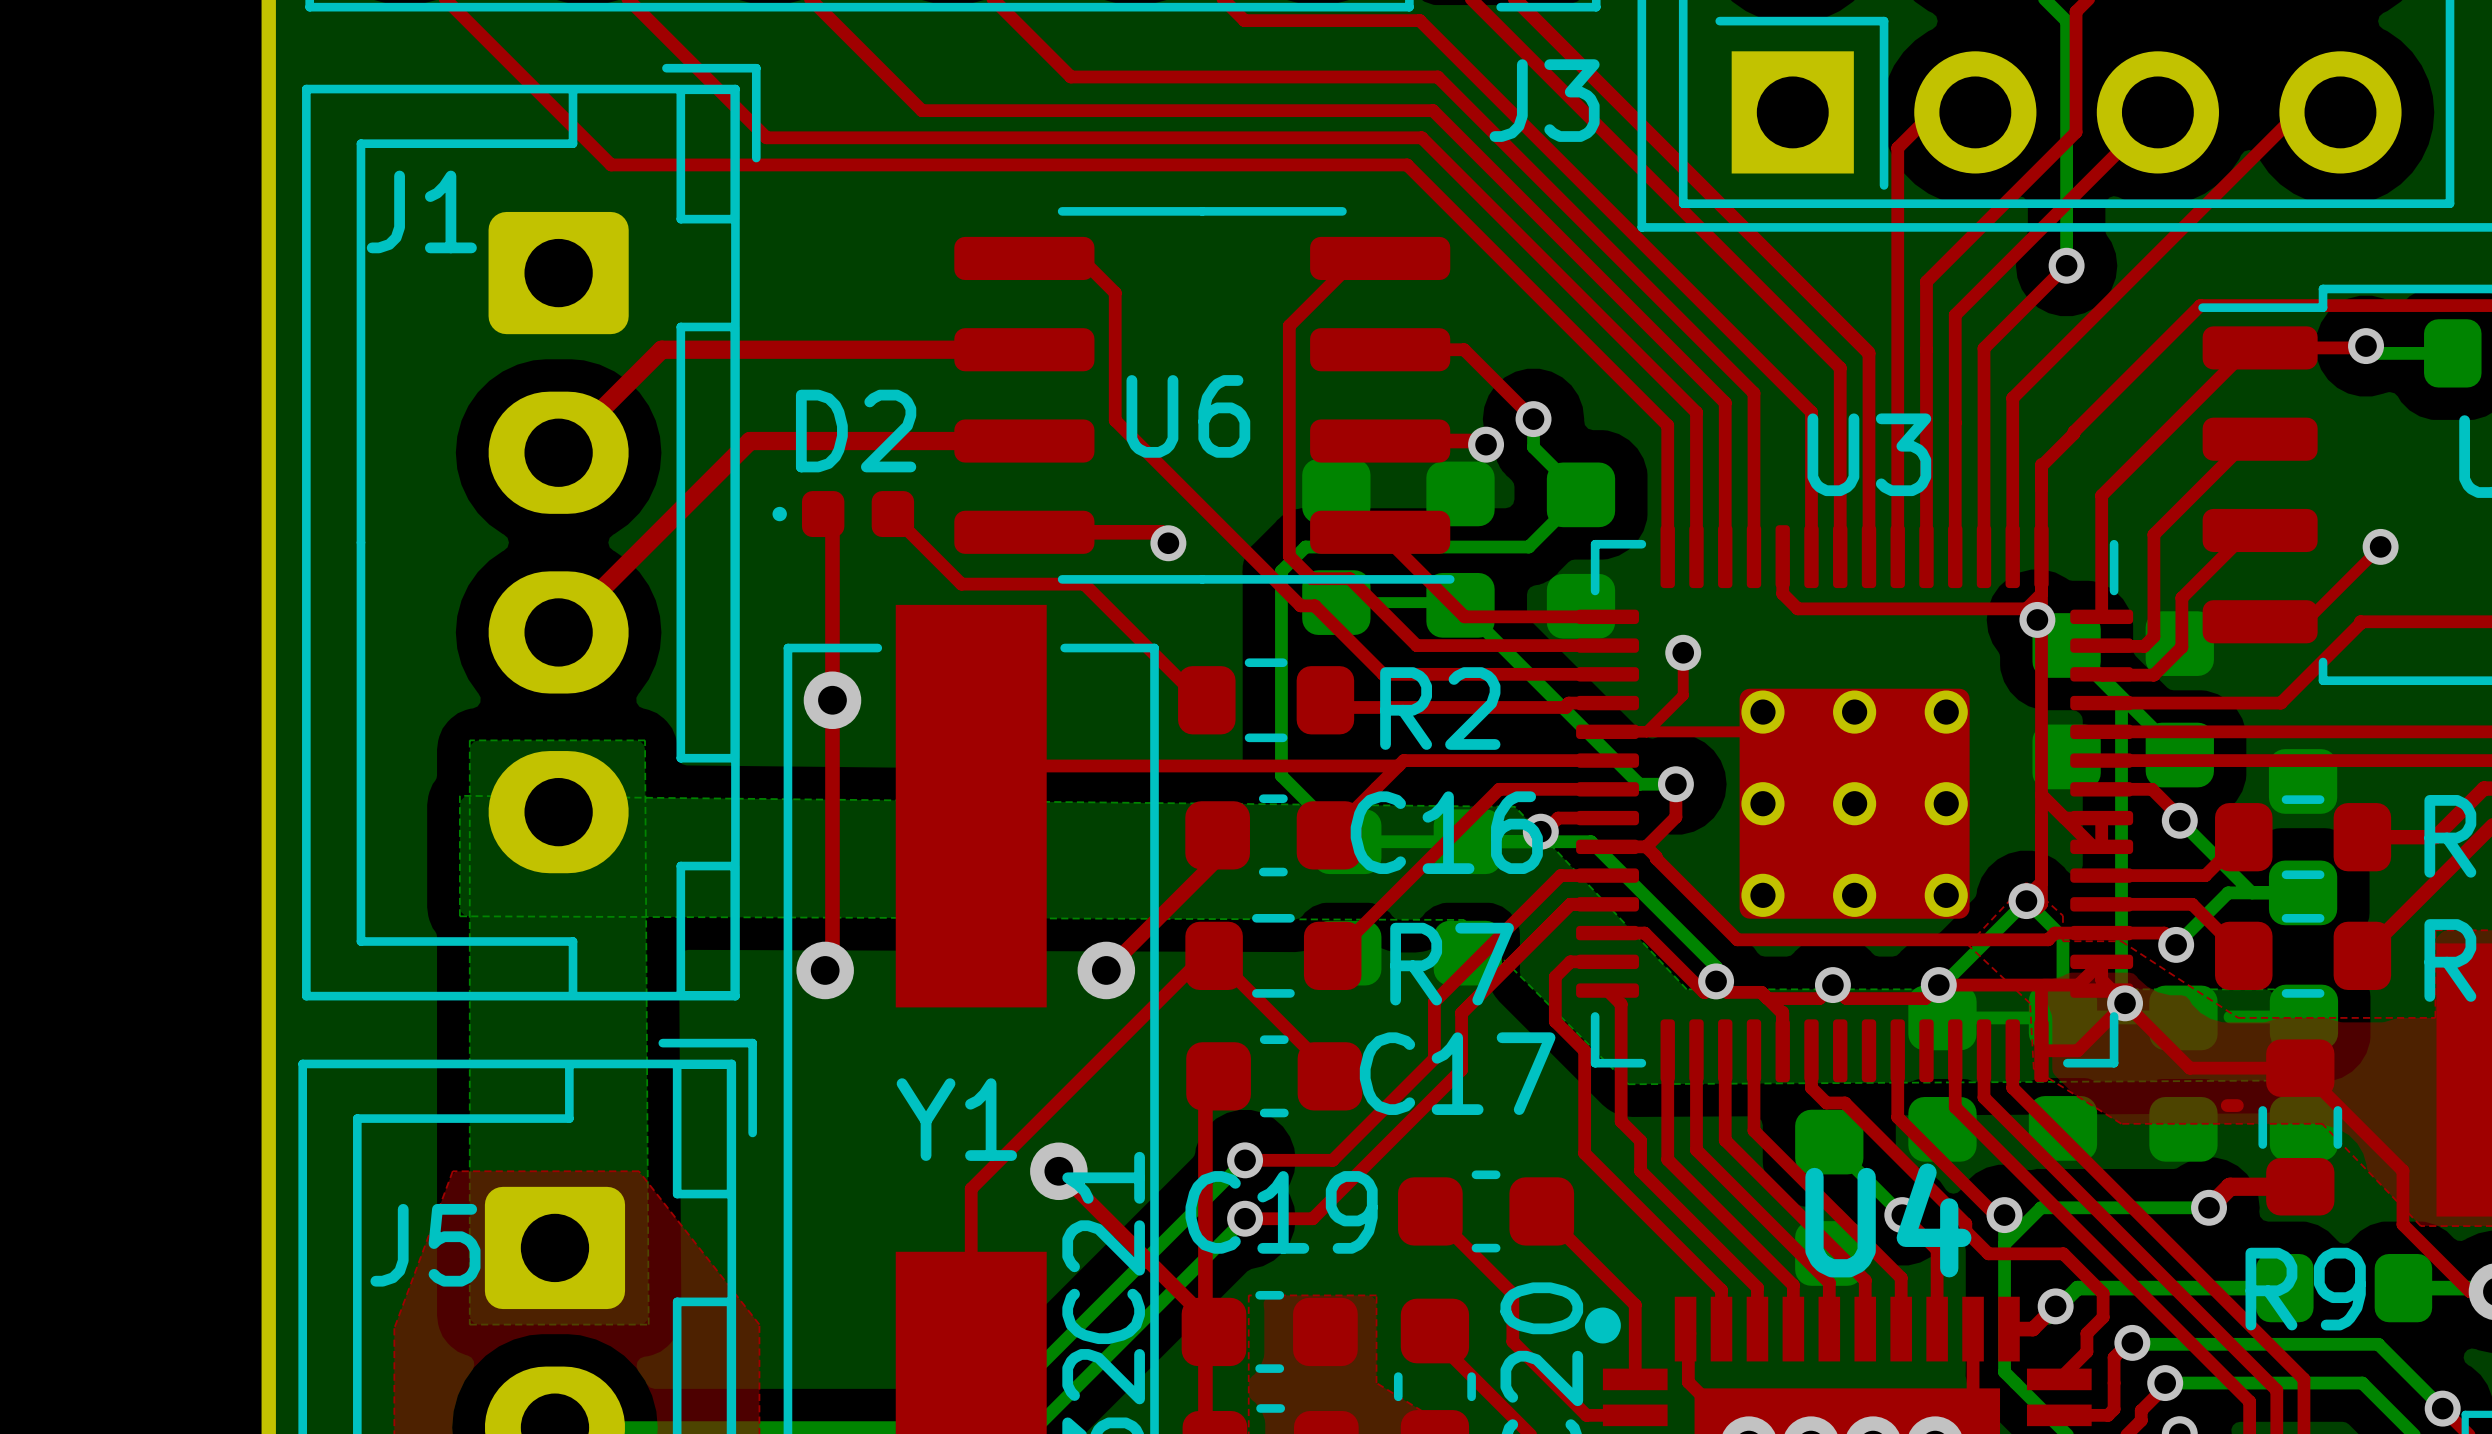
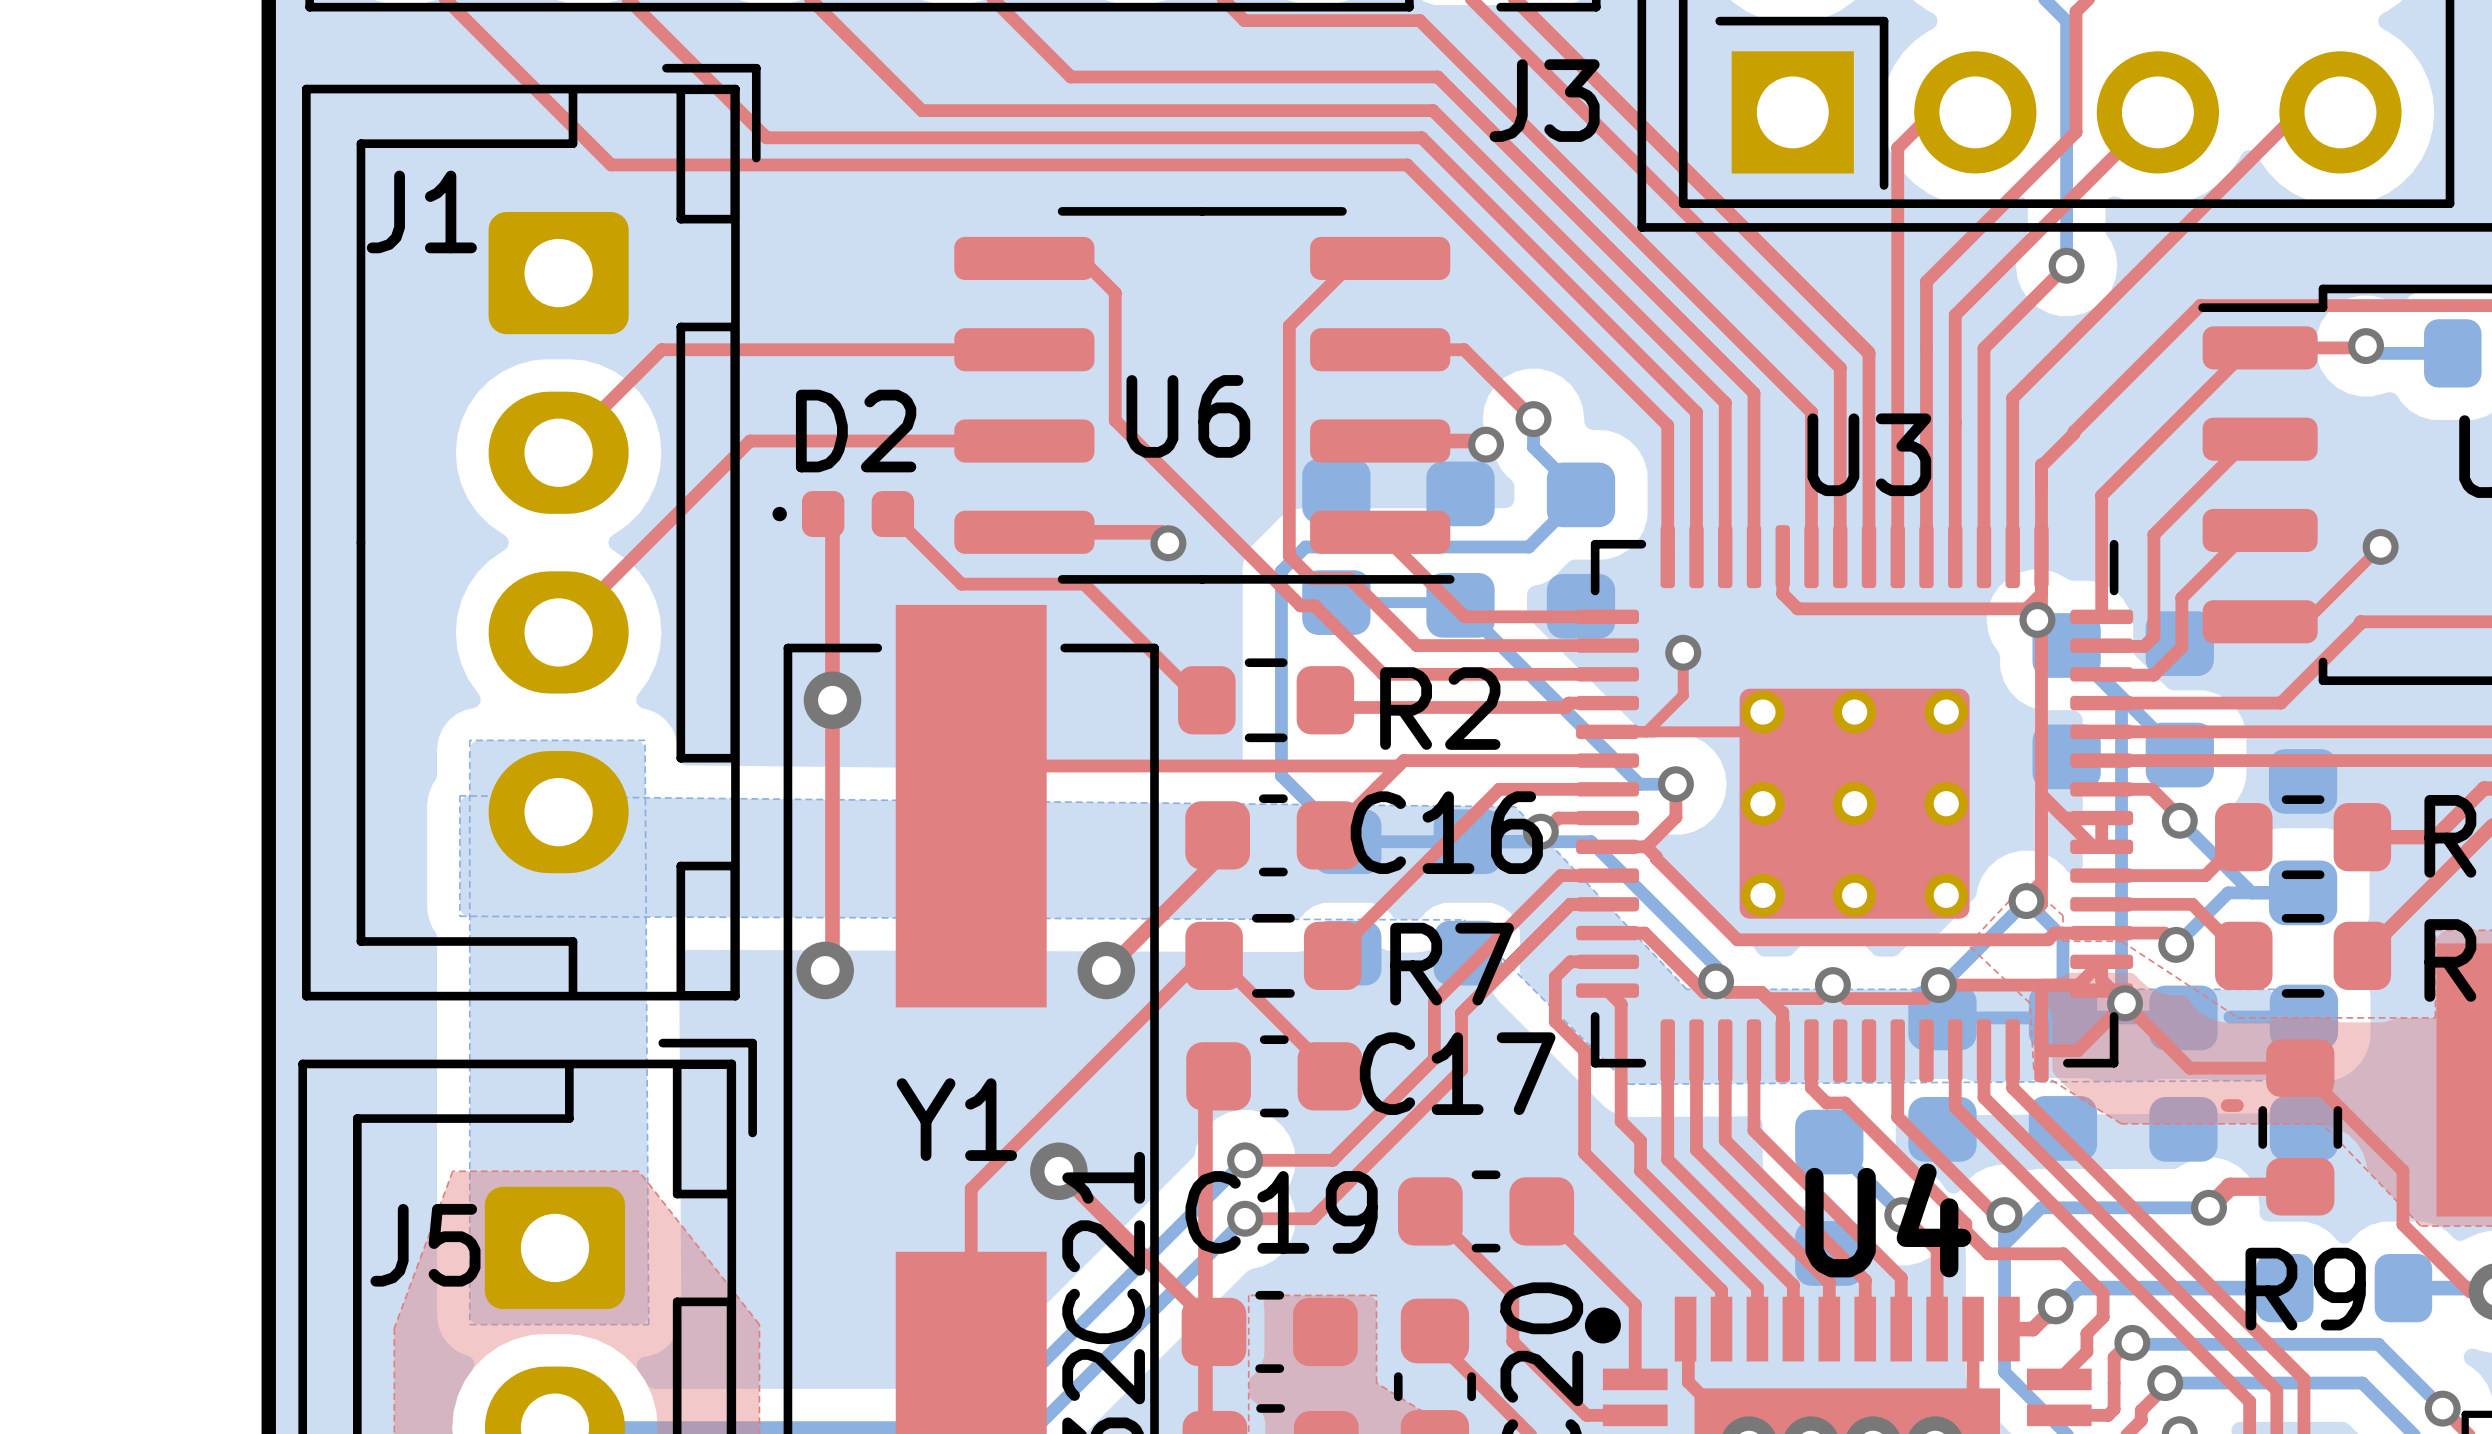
top track width: thick (1024, 349) (661, 349) (558, 452) -> thin (1024, 349) (661, 349) (558, 452)
top track width: thick (1024, 441) (750, 441) (558, 632) -> thin (1024, 441) (750, 441) (558, 632)

